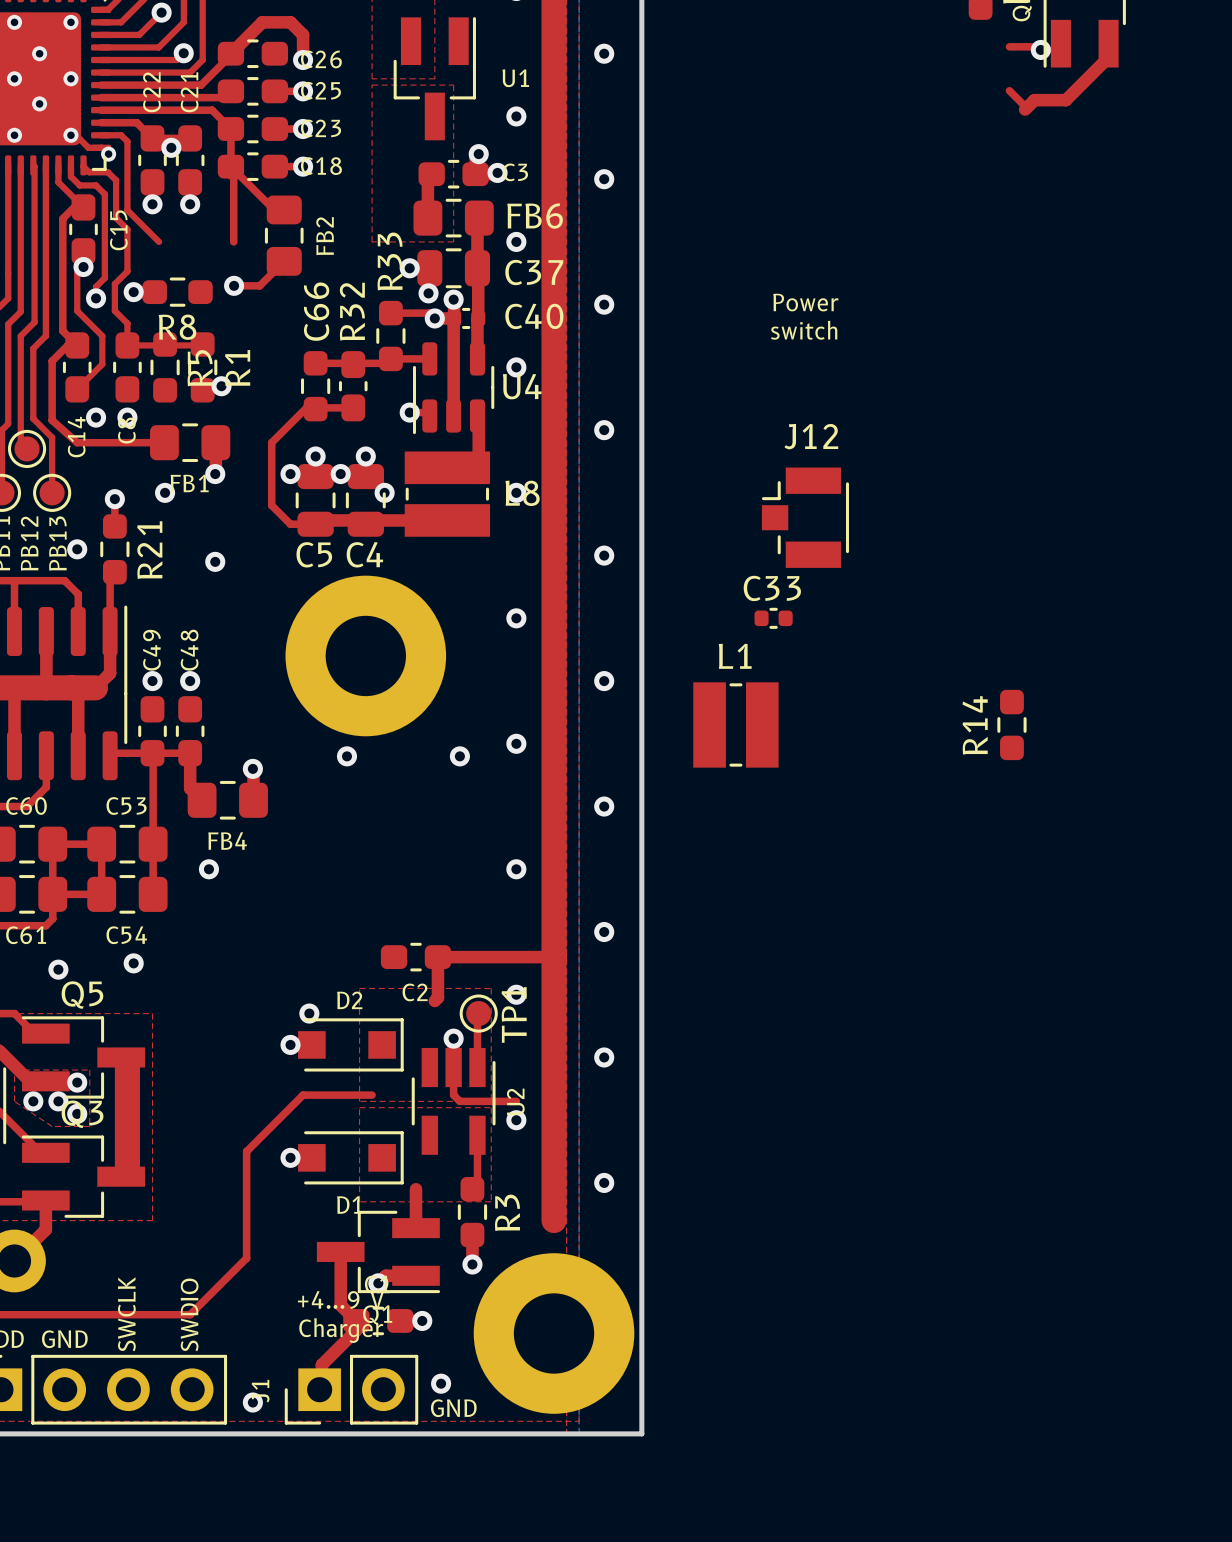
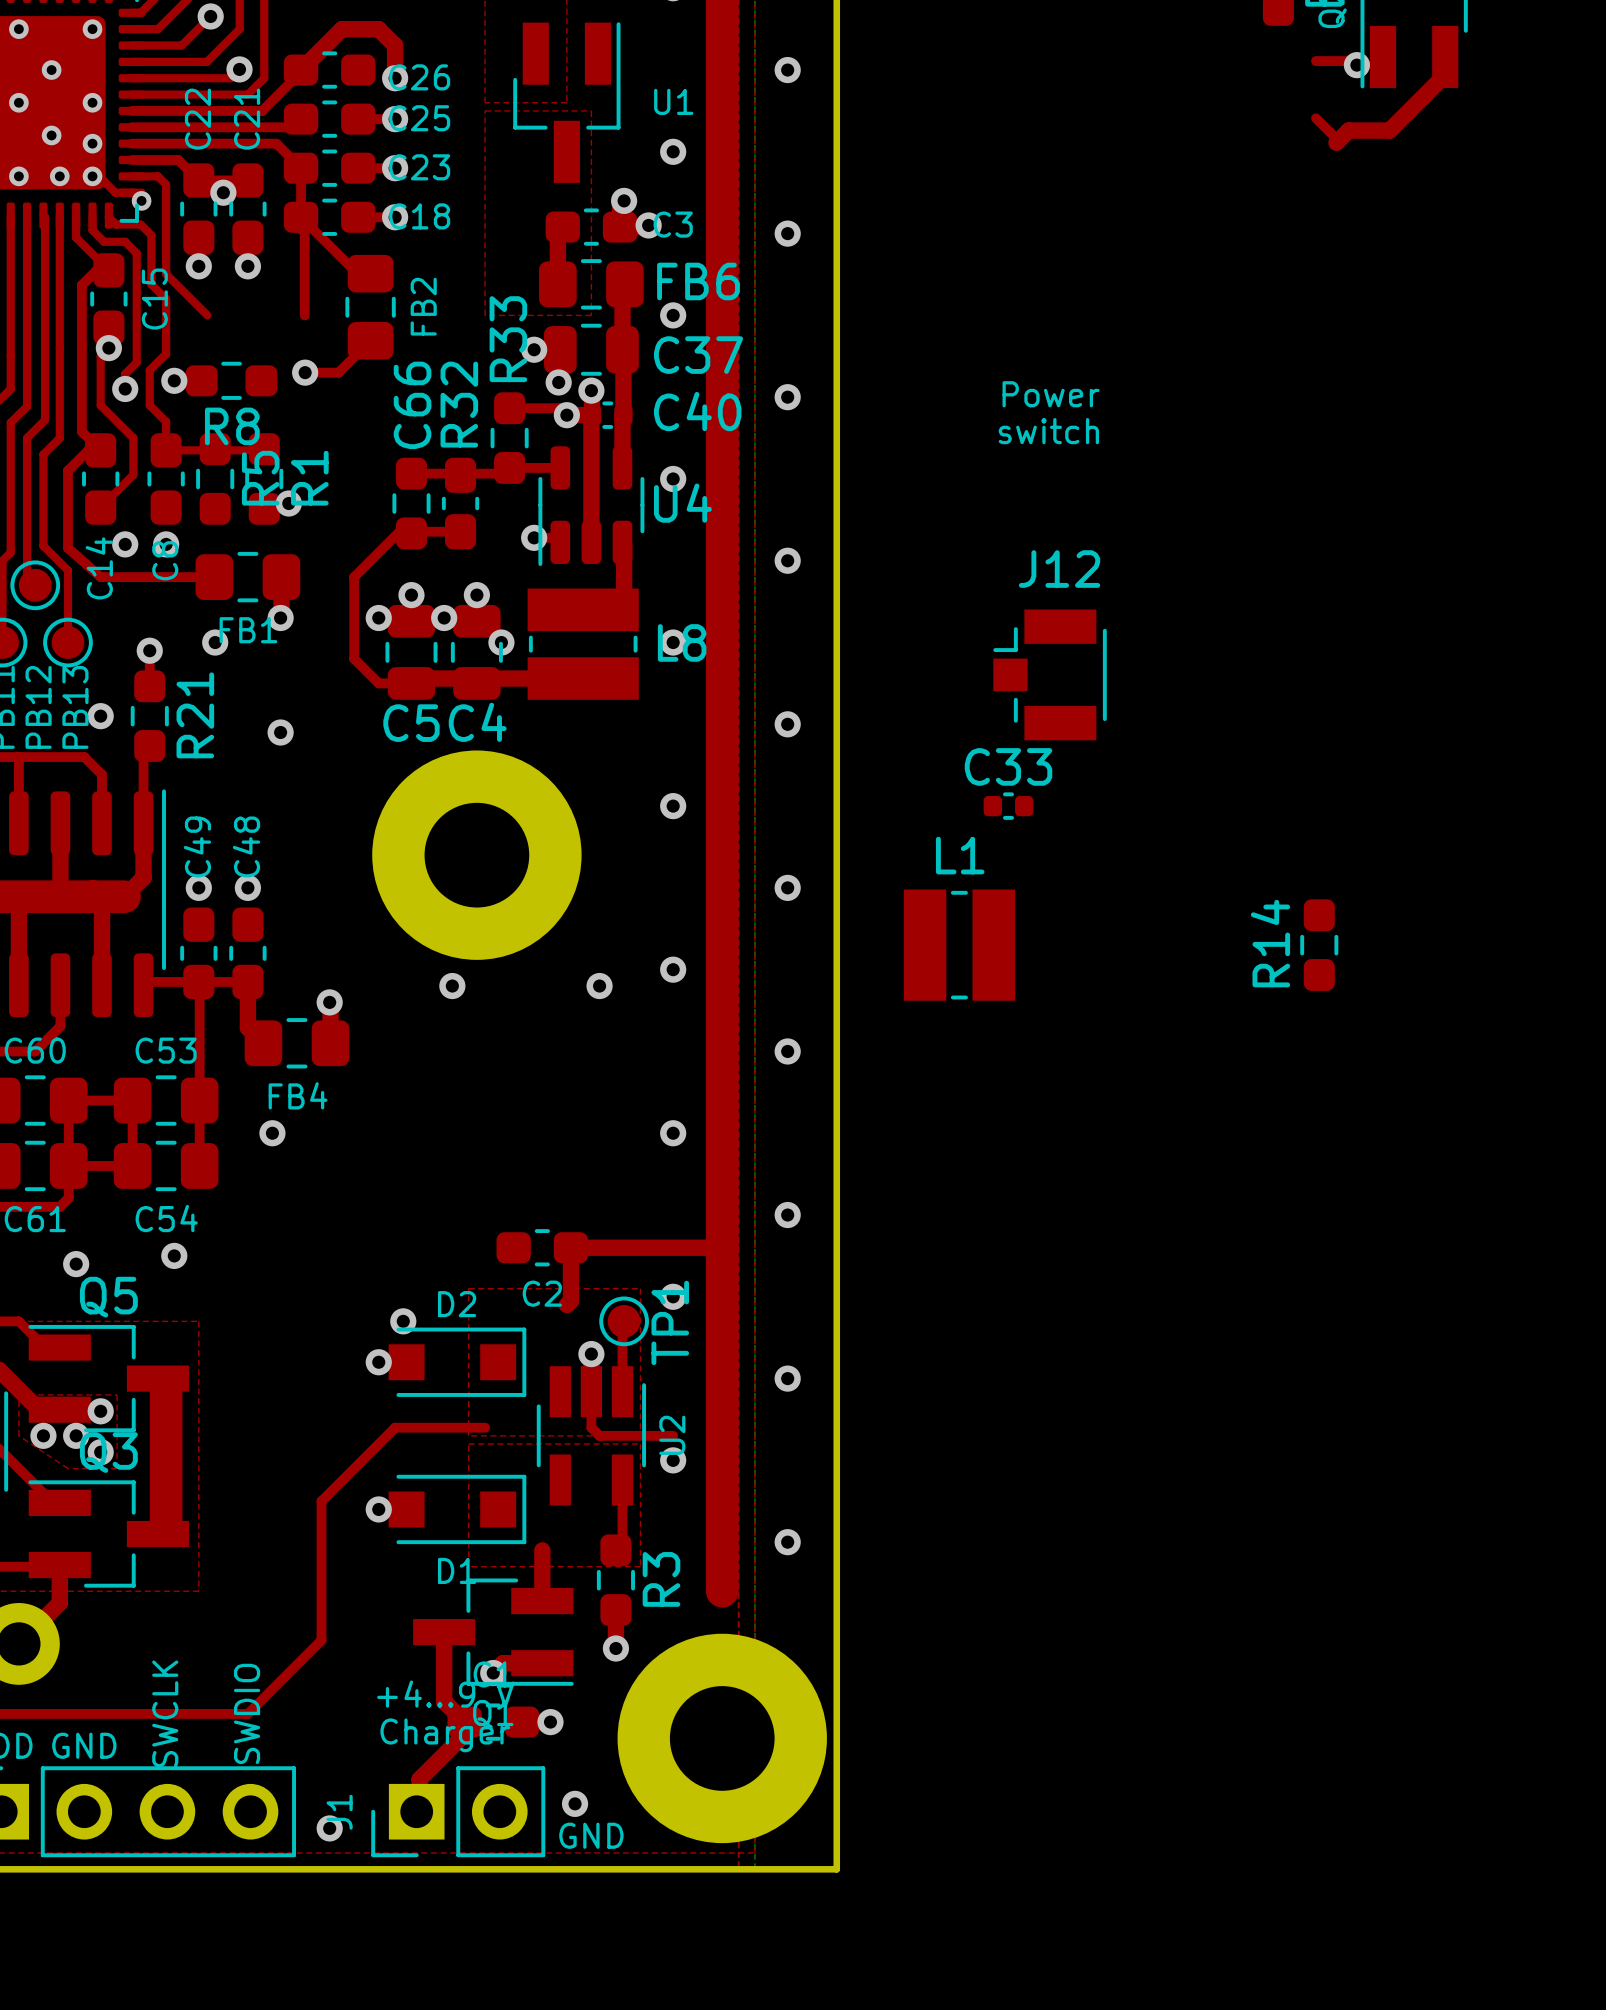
via: none -> (92, 143)
via: none -> (59, 176)

